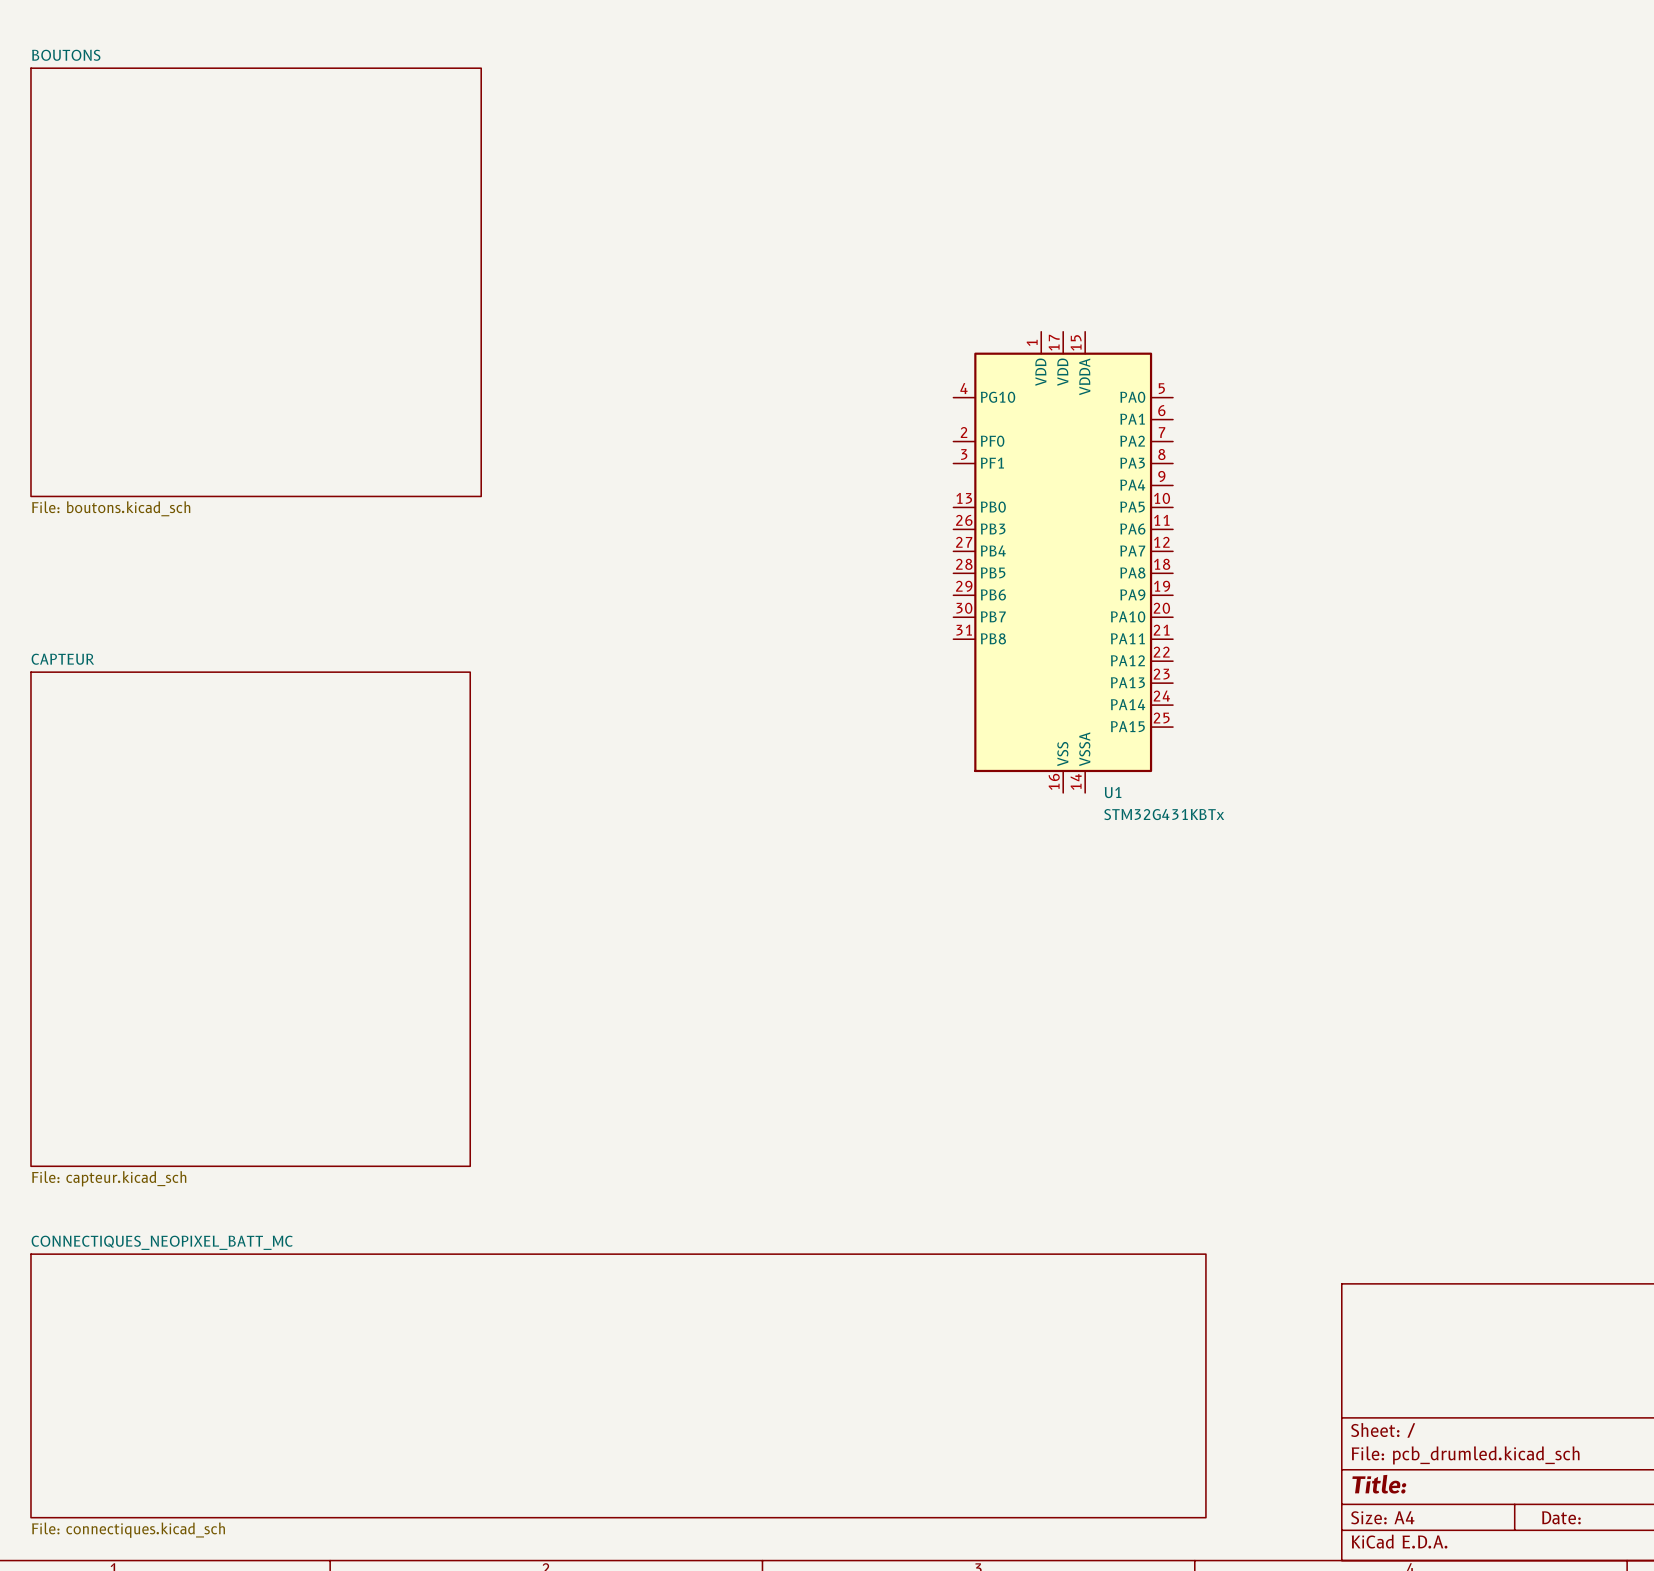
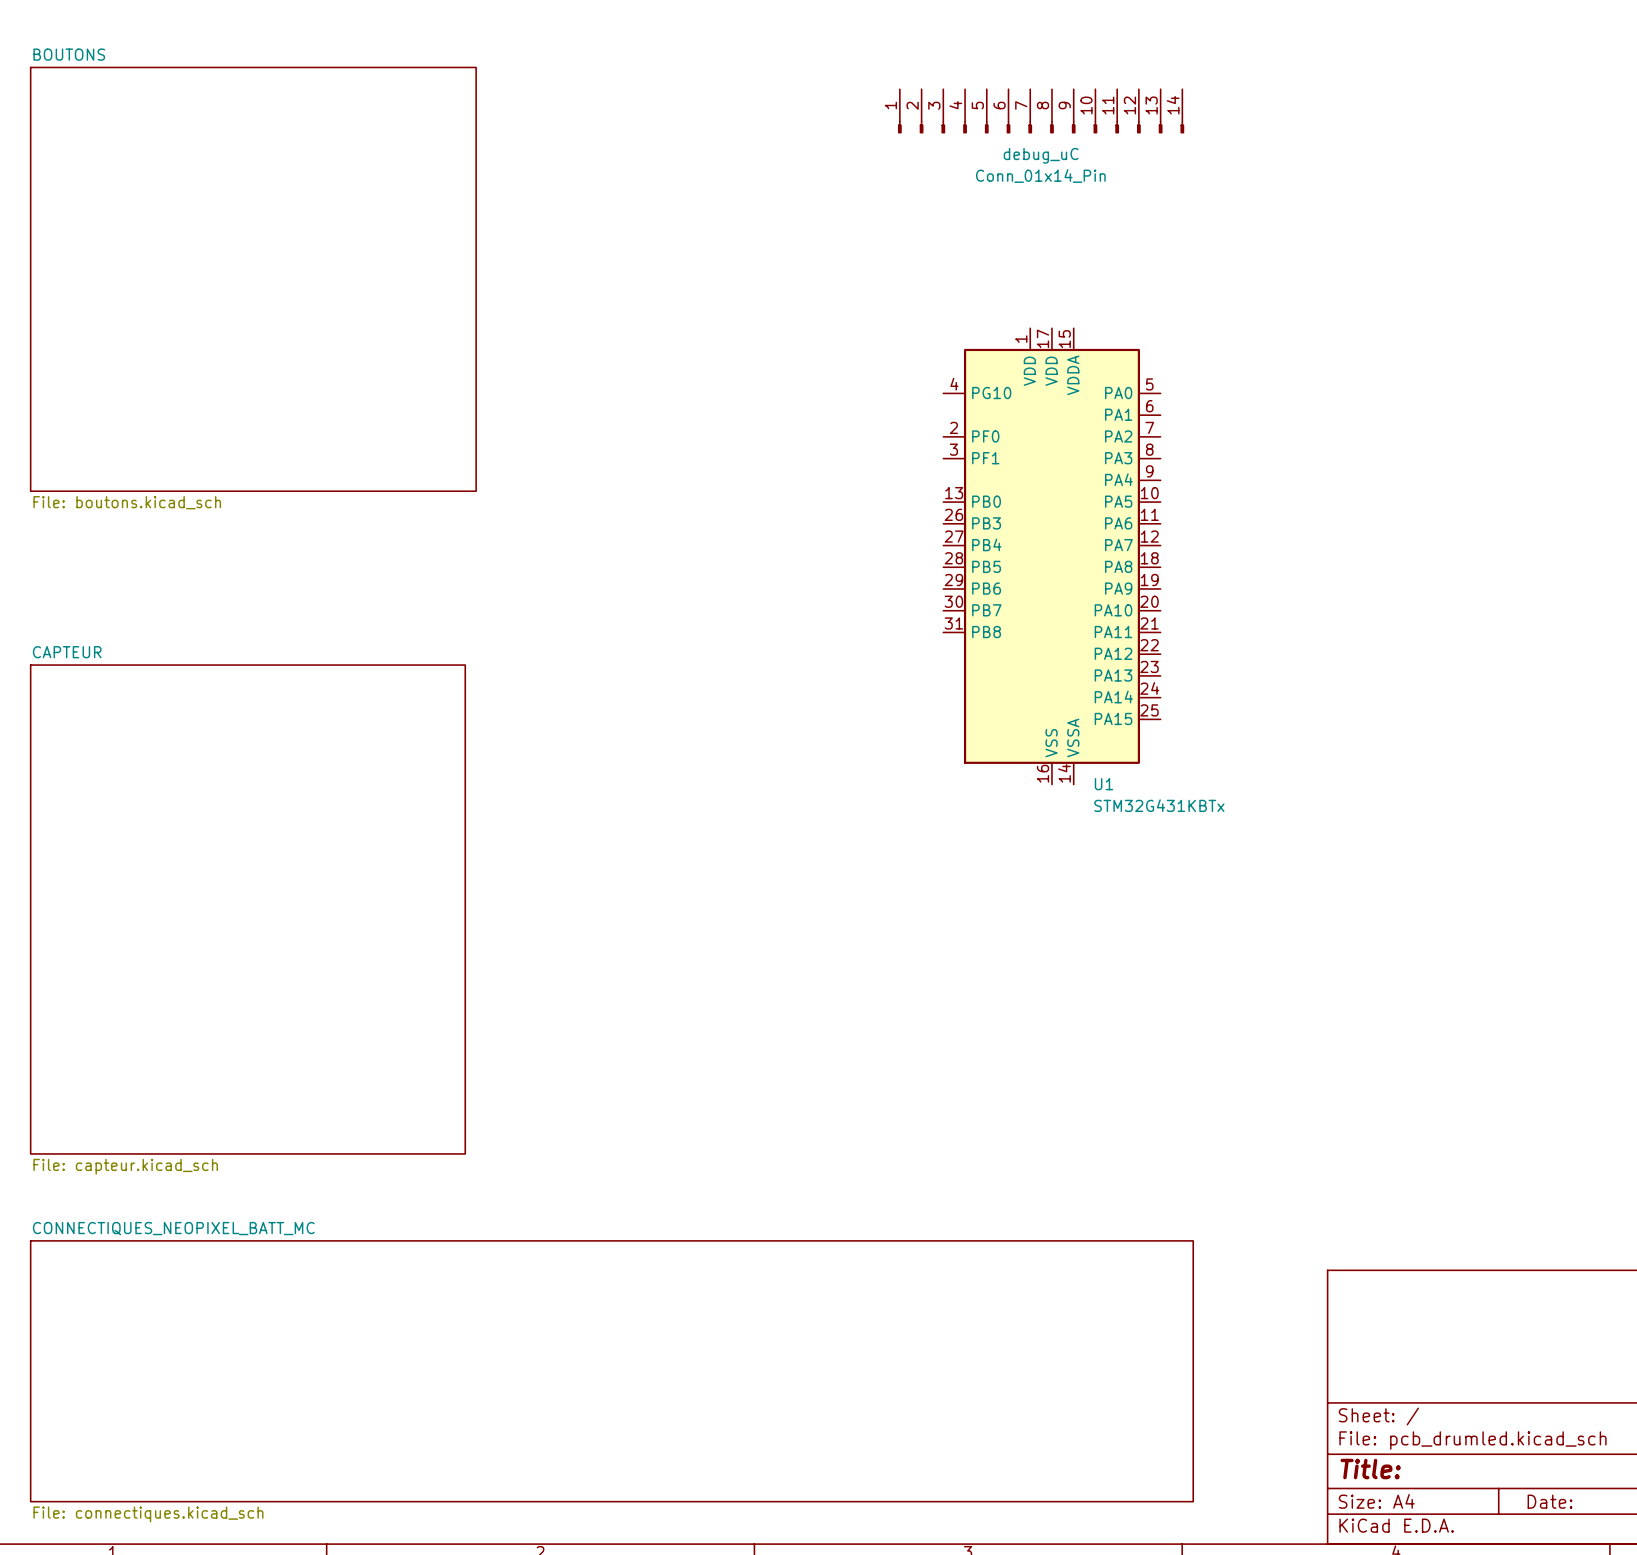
debug_uC: none -> Conn_01x14_Pin (1041, 111)

